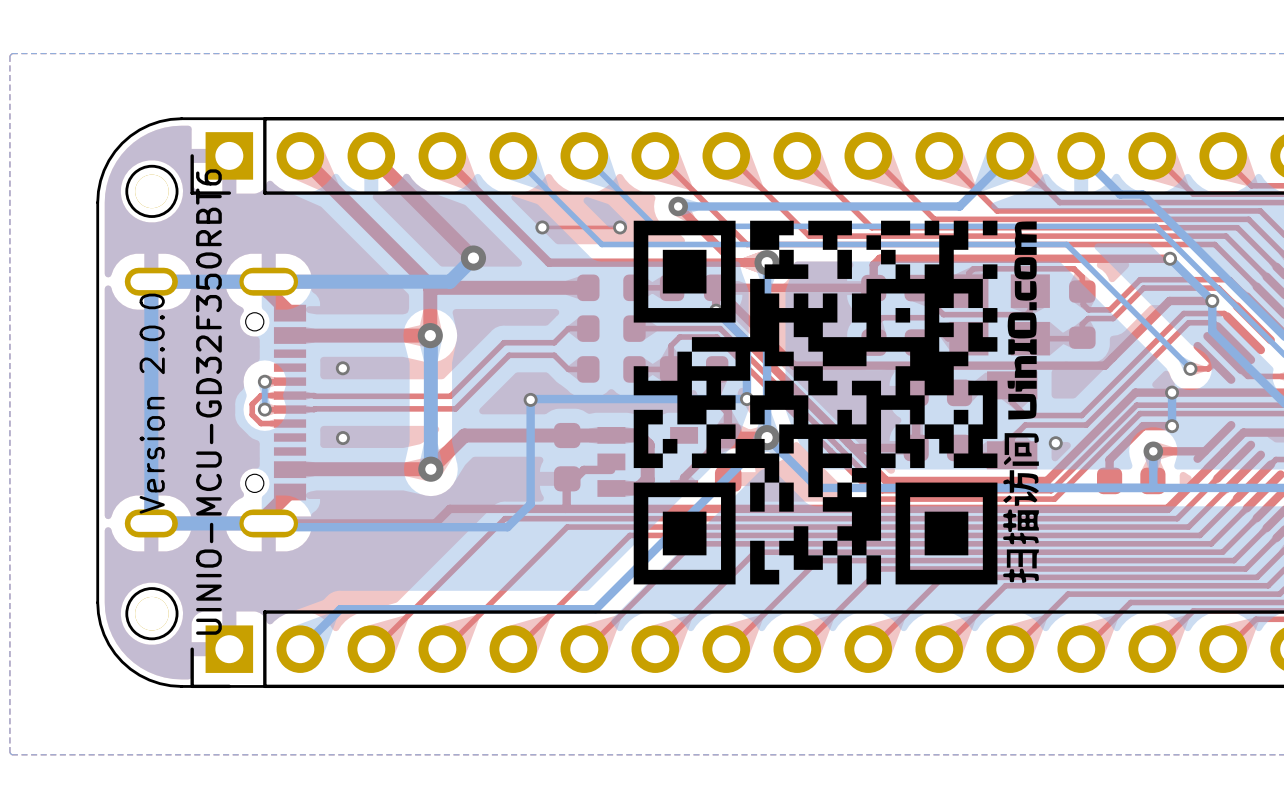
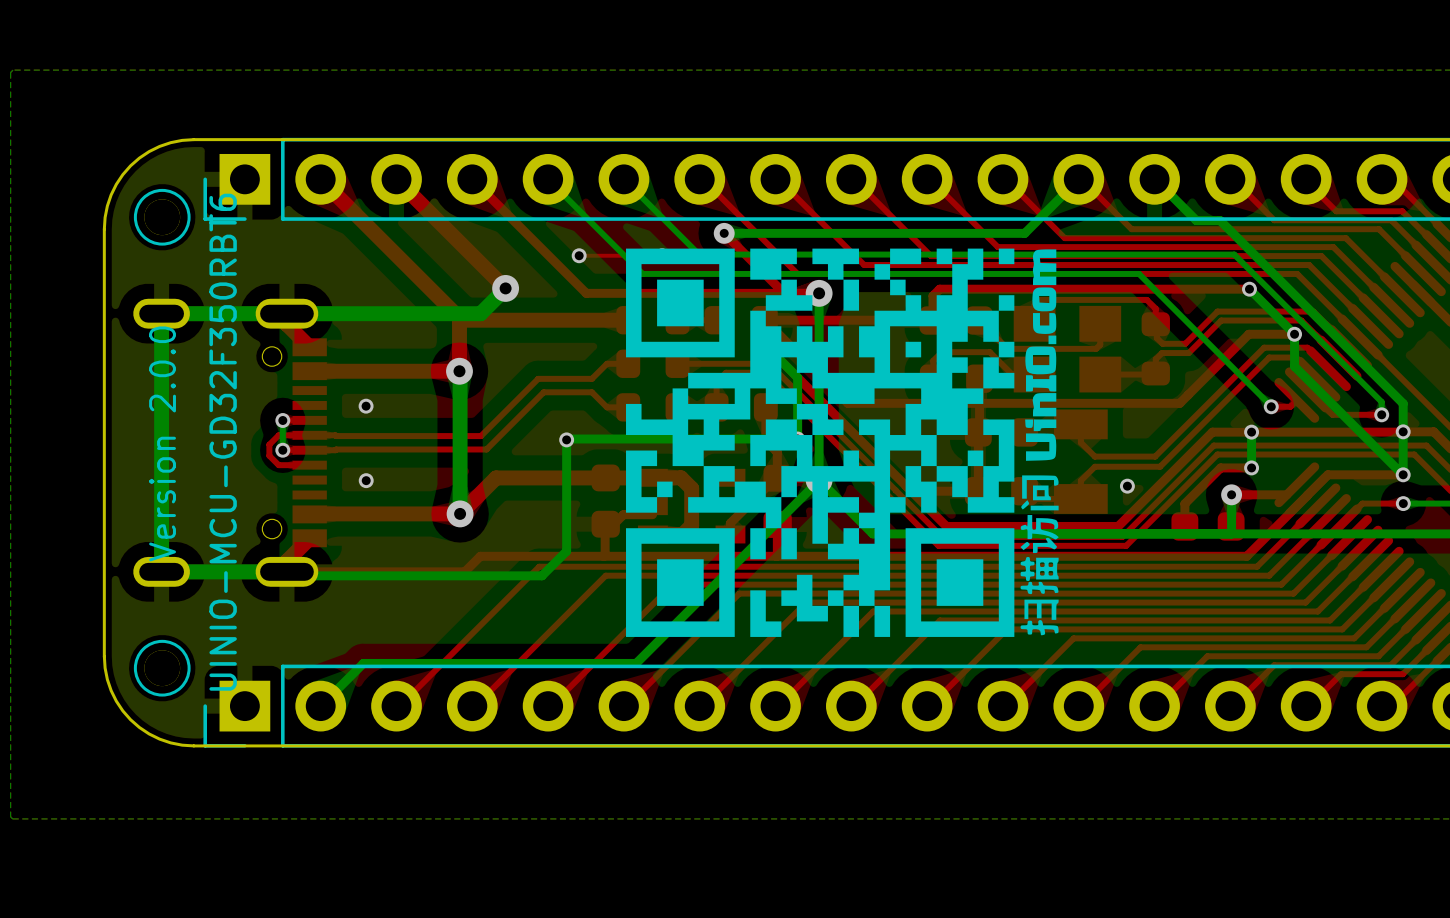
drawing position: (836, 402) -> (842, 442)

